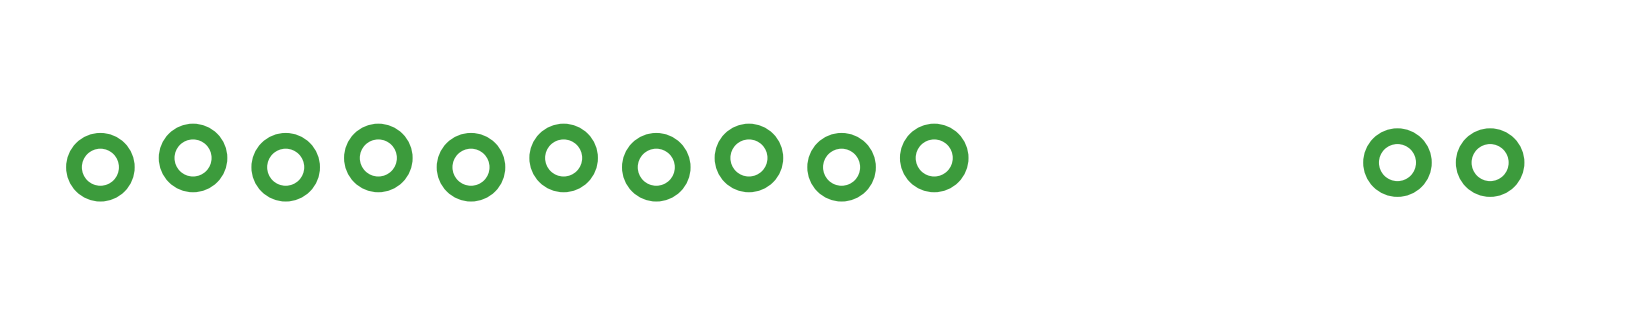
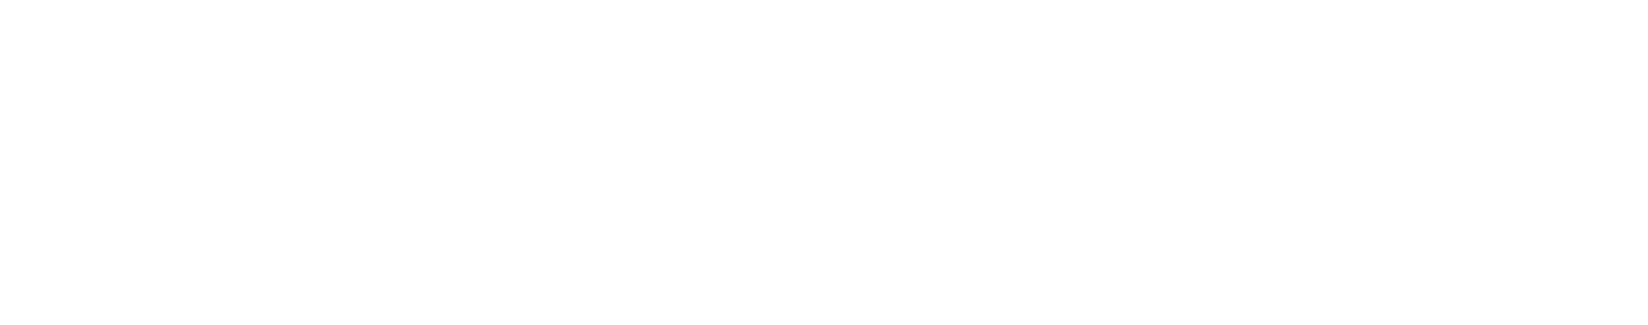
part: (517, 162) -> none
part: (1443, 162) -> none

